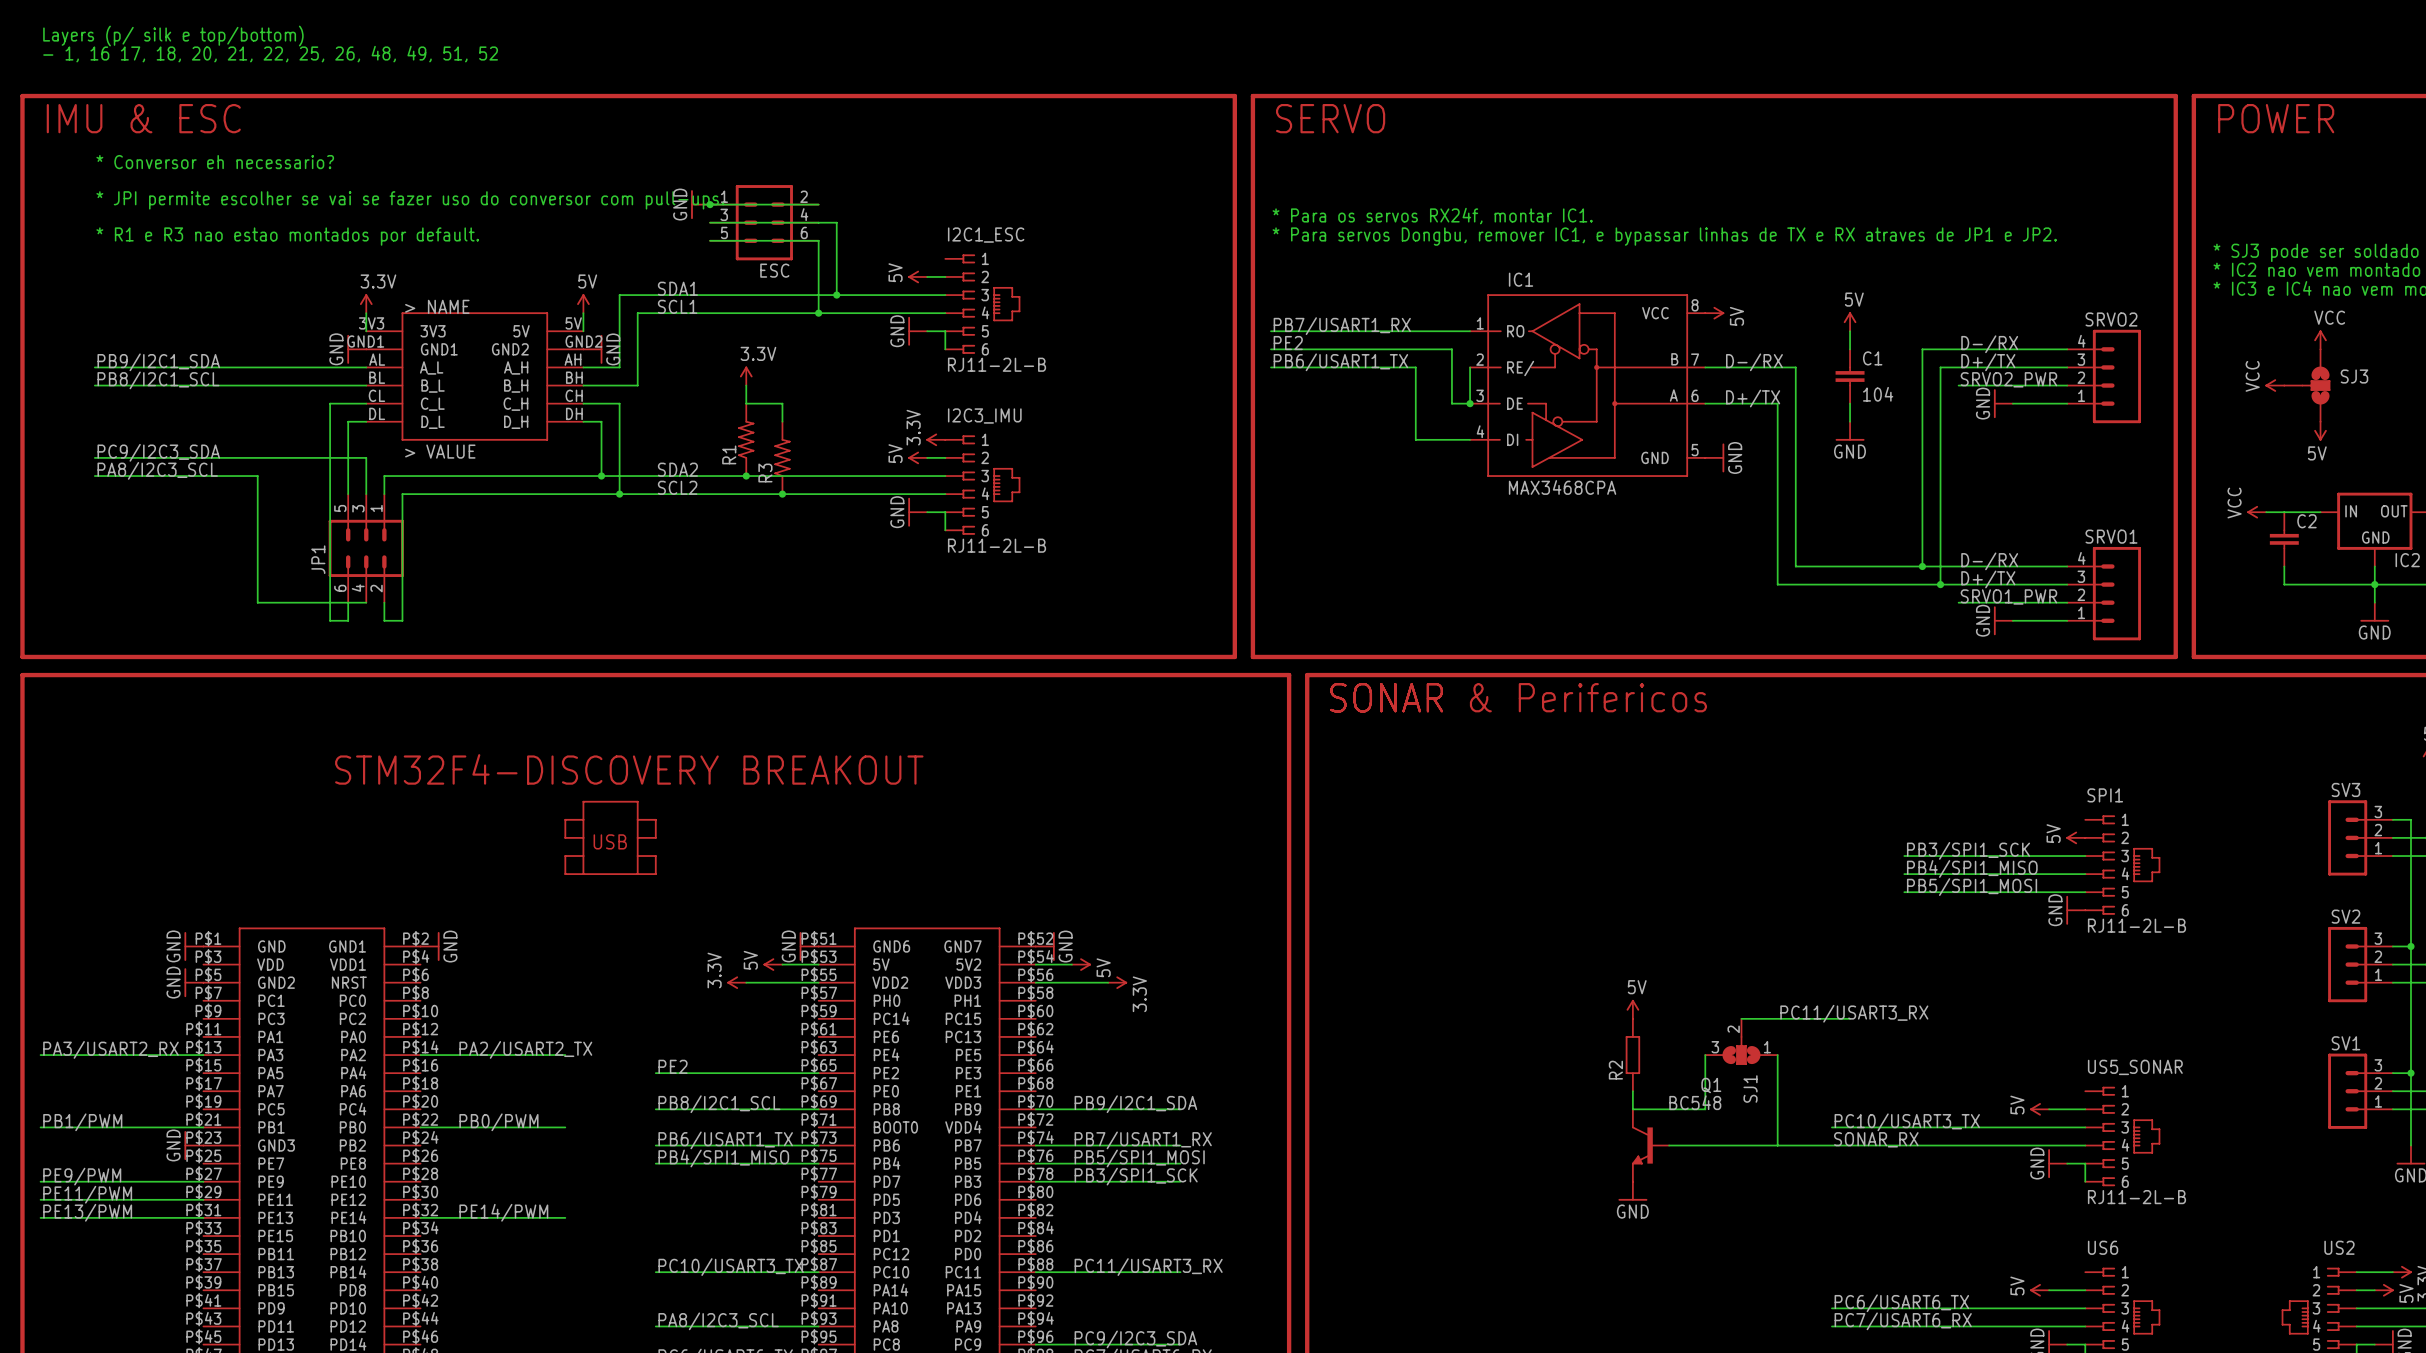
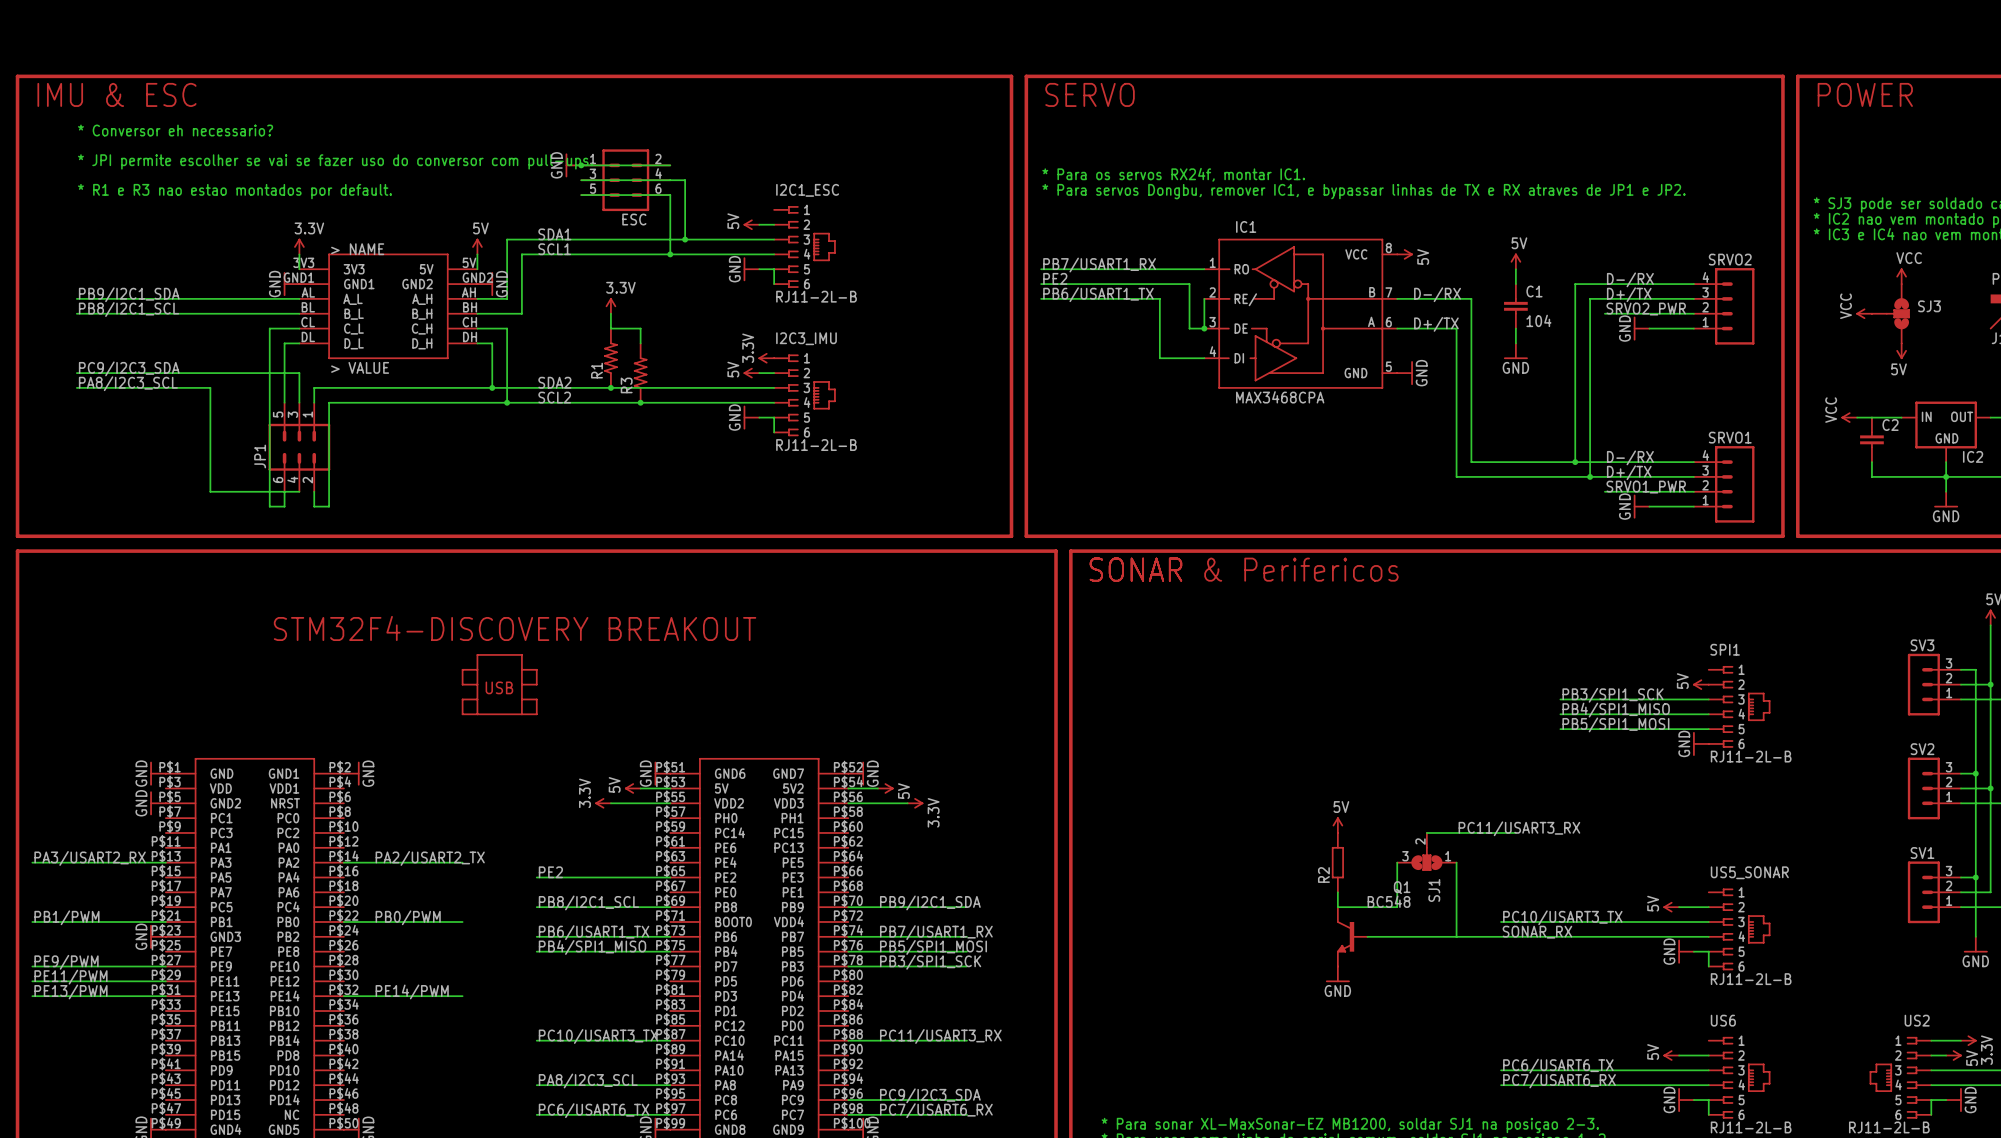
text: Layers (p/ silk e top/bottom) (173, 36) -> none
text: - 1, 16 17, 18, 20, 21, 22, 25, 26, 48, 49, 51, 52 (270, 54) -> none

